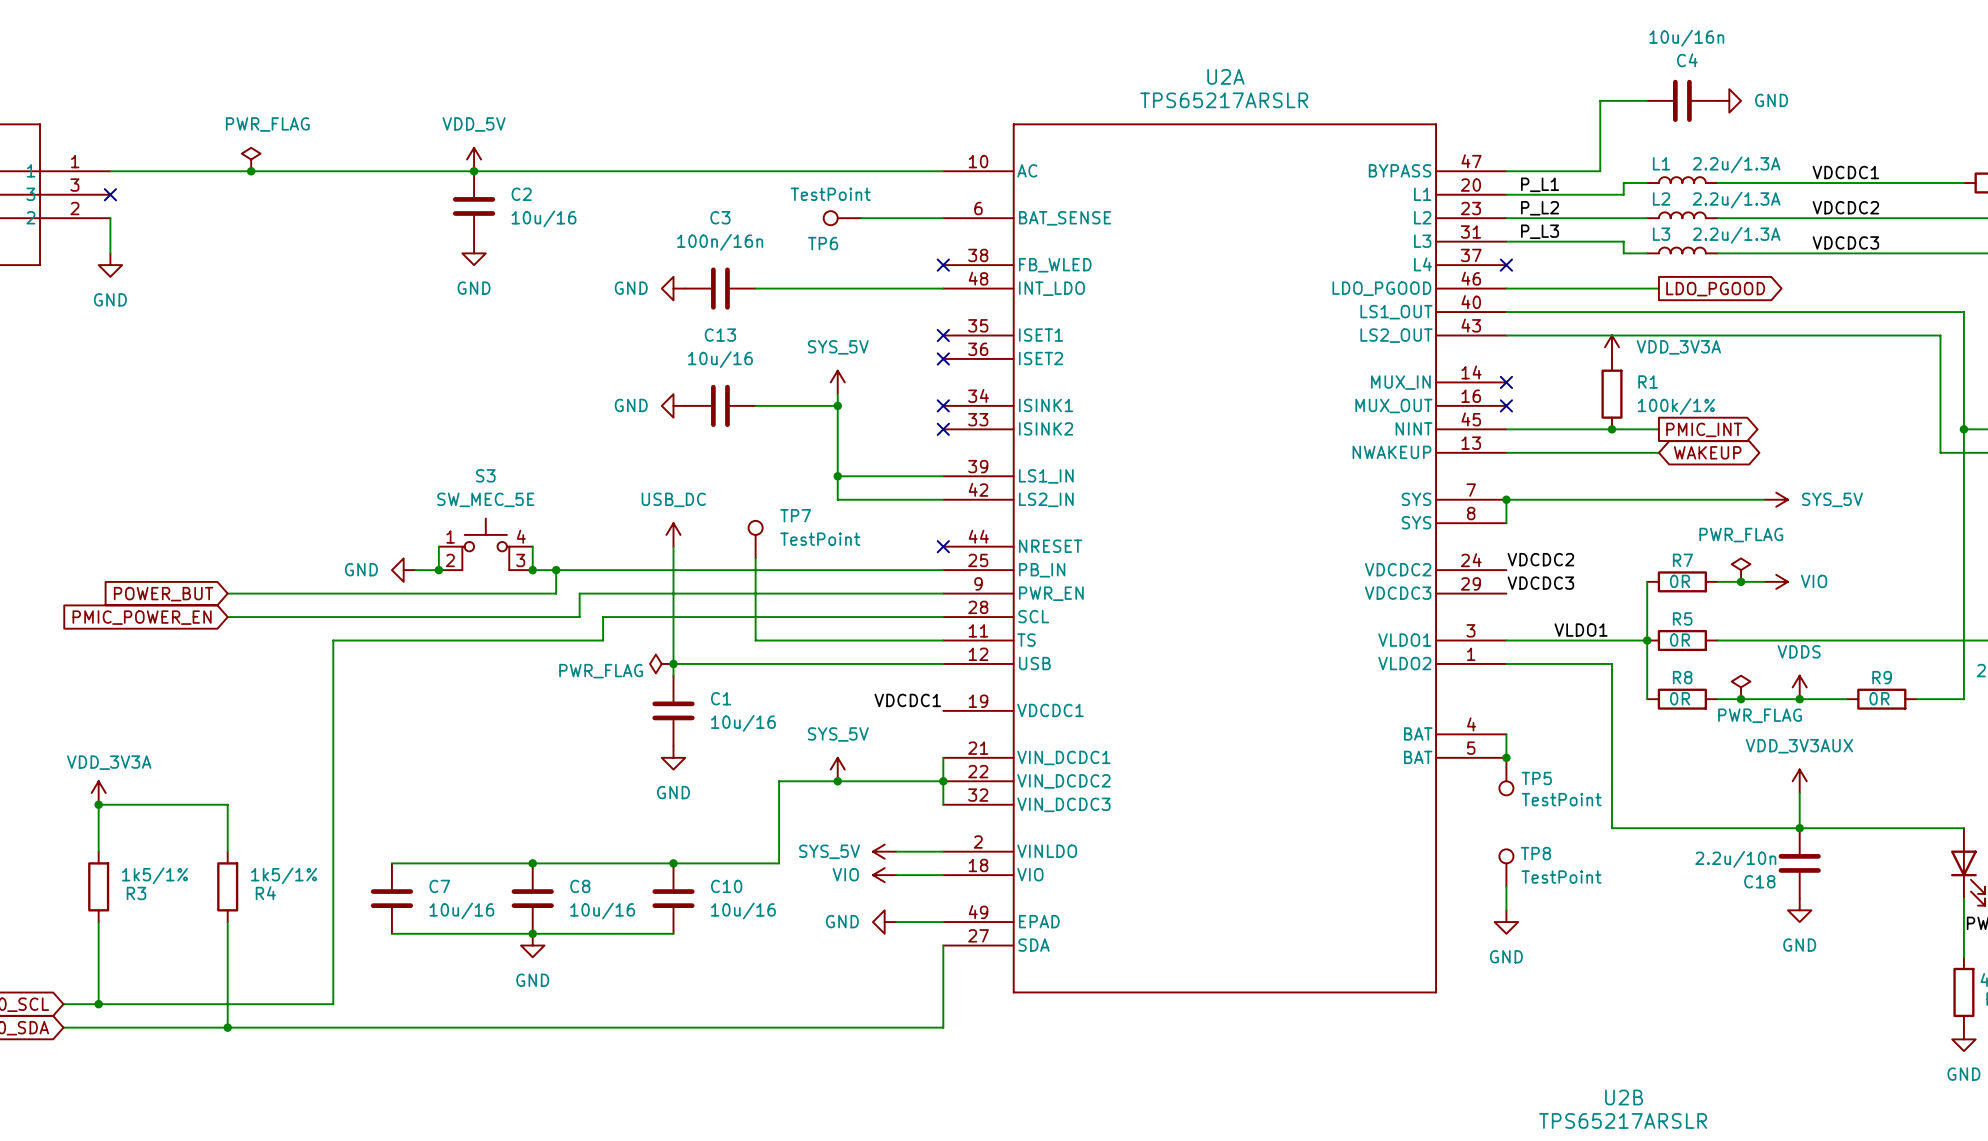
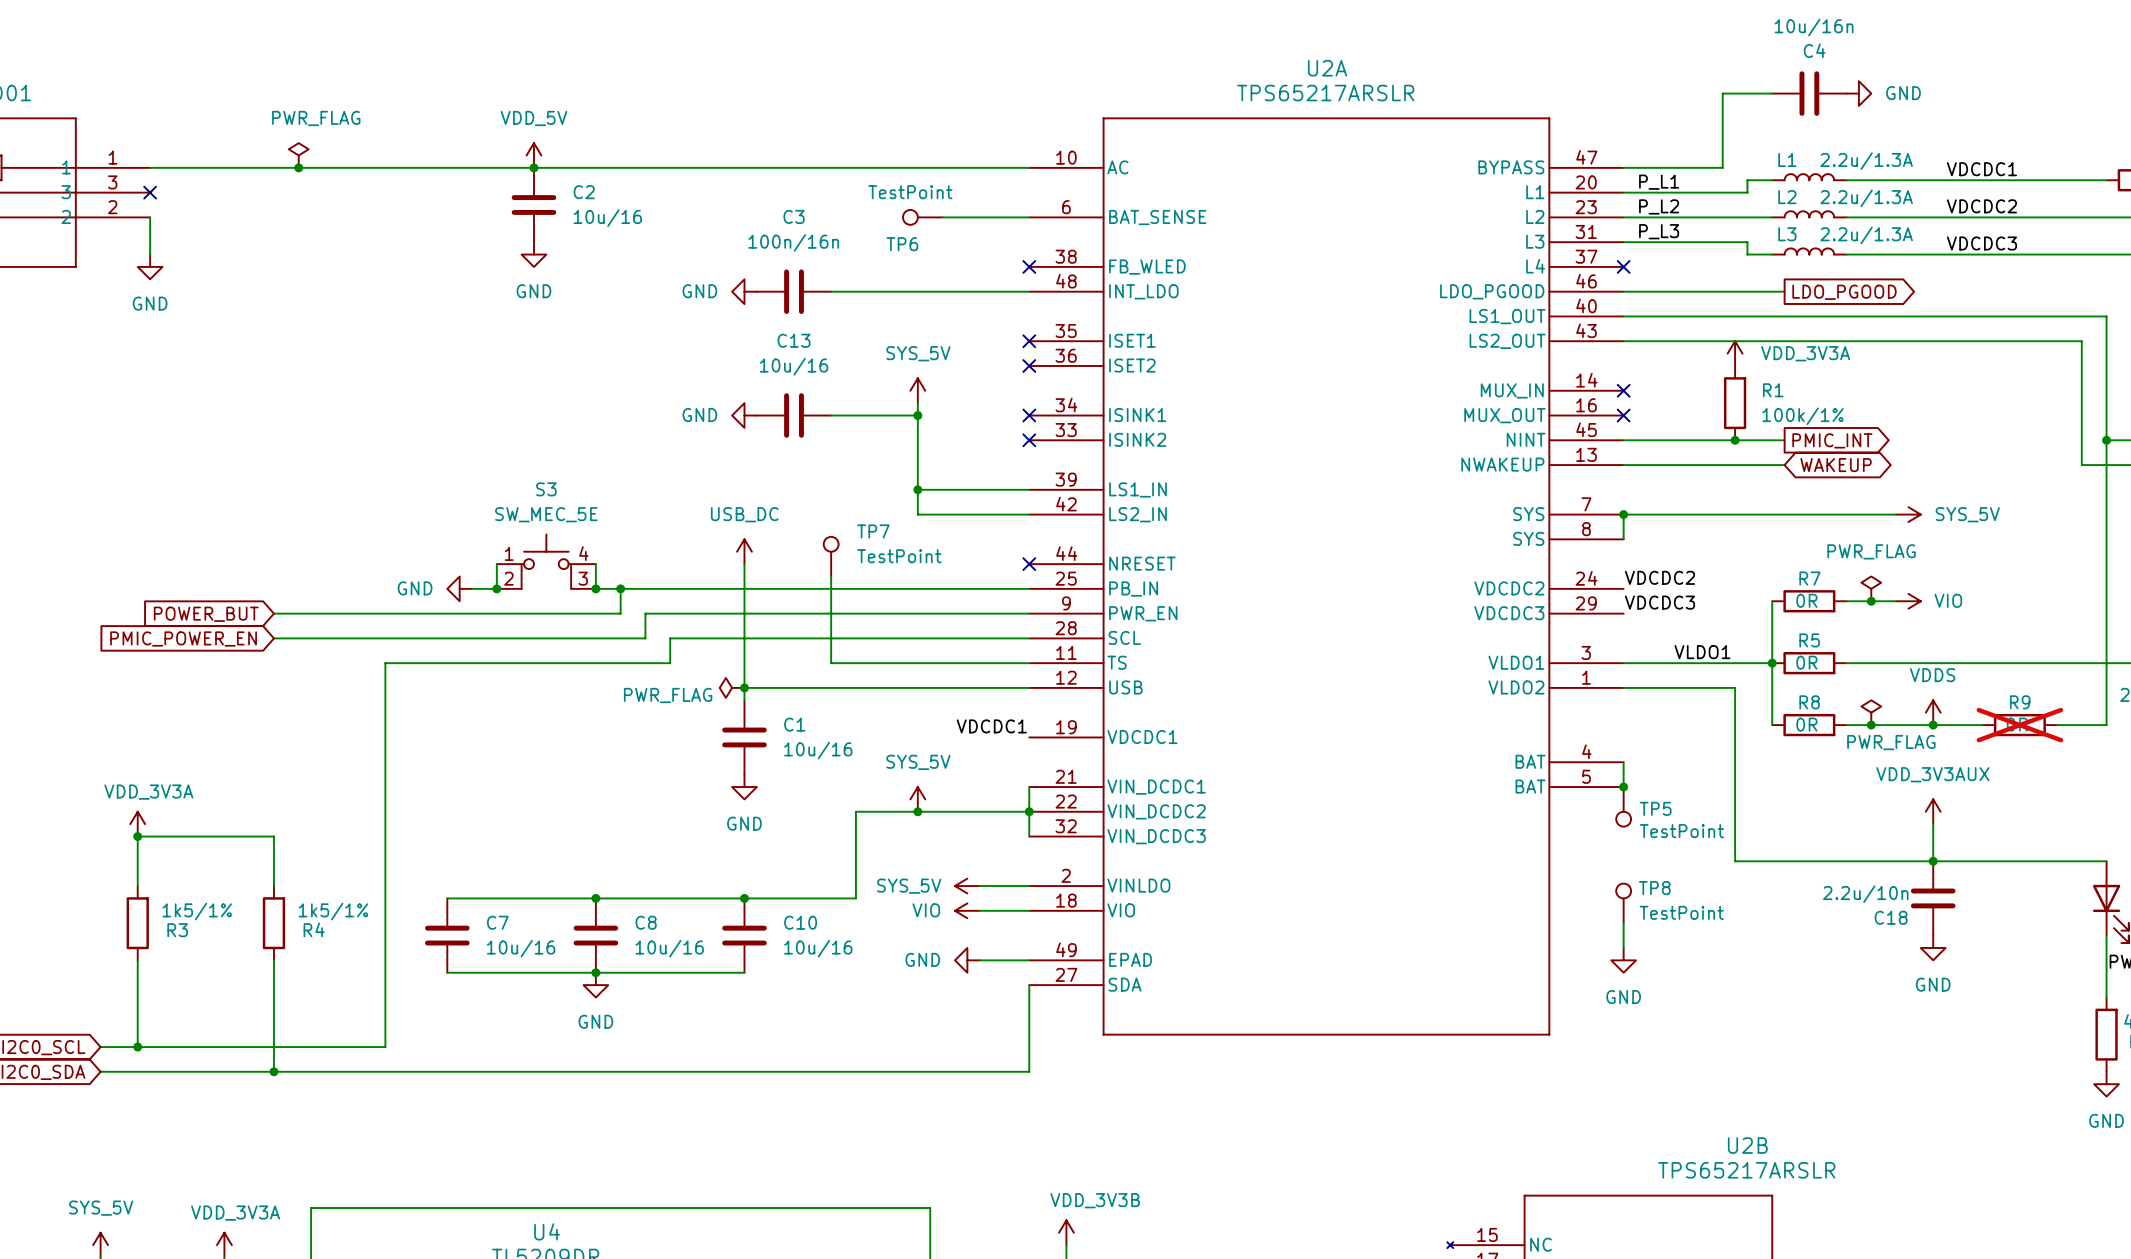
R9 do-not-place cross: none -> (2019, 725)

